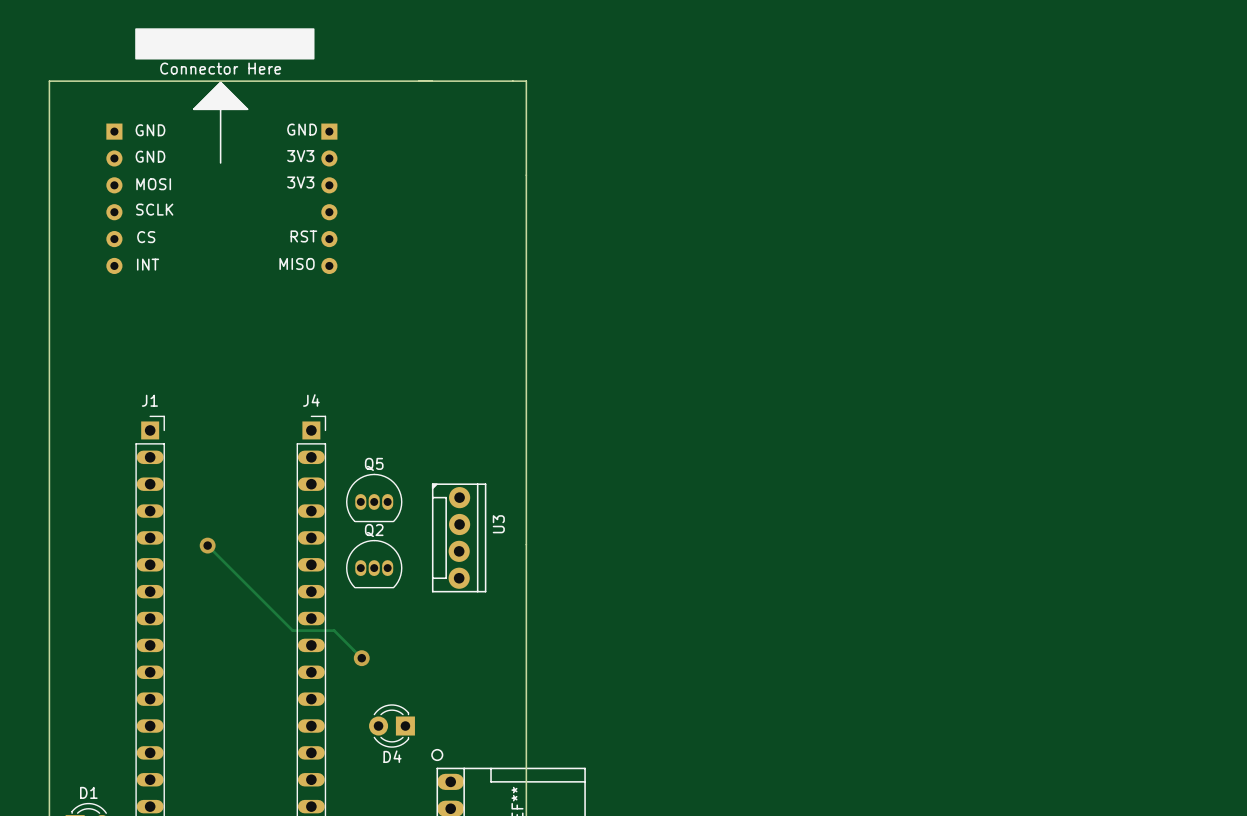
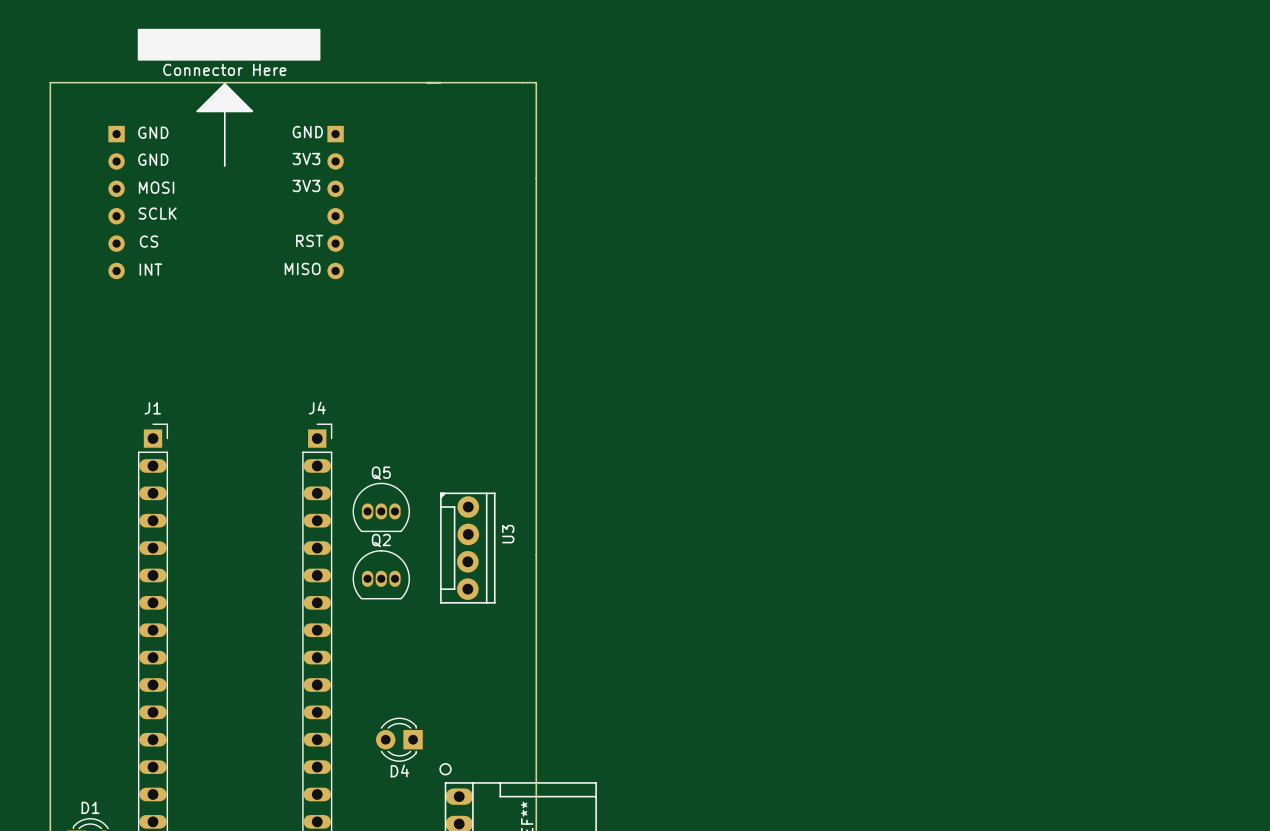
track: (207, 545) (292, 630) (334, 630) (361, 658) -> none
via: (207, 545) -> none
via: (361, 658) -> none

